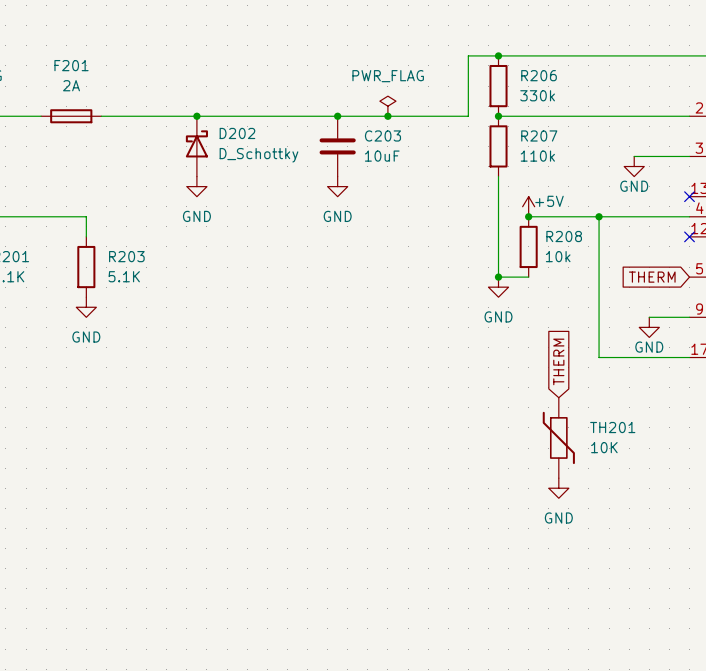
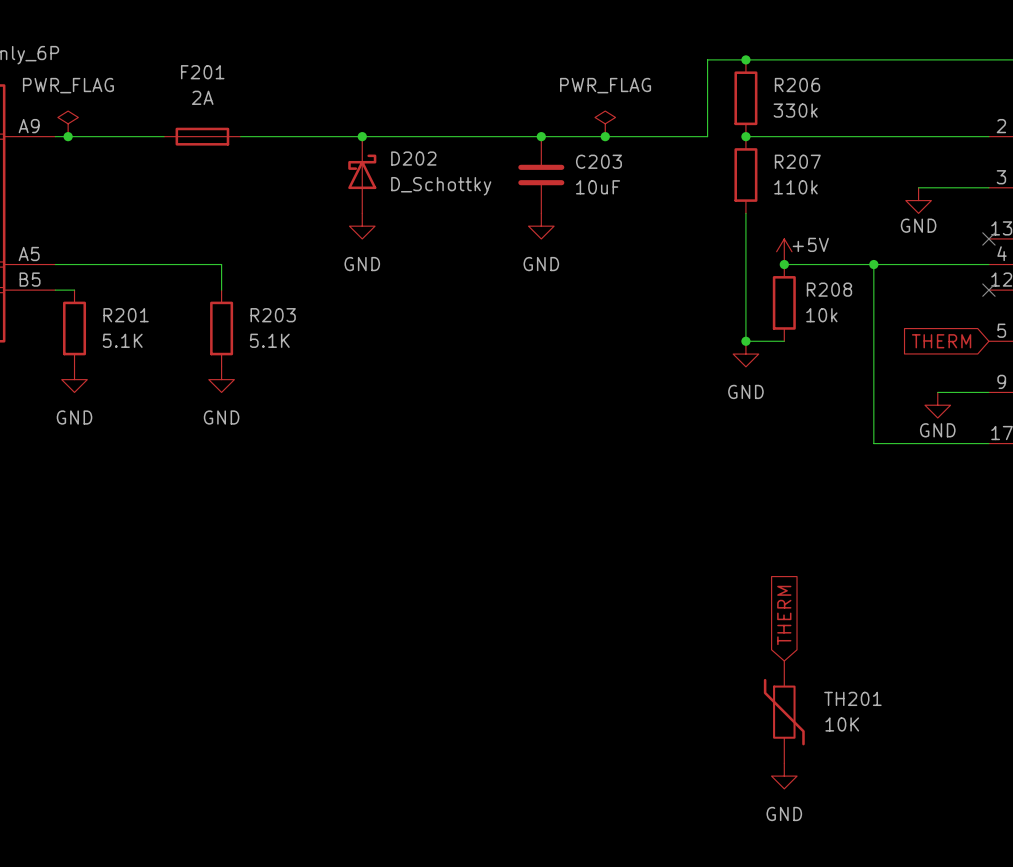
global label position: THERM (558, 361) -> THERM (784, 615)
TH201 position: (558, 437) -> (784, 712)
power symbol position: GND (558, 488) -> GND (784, 776)

